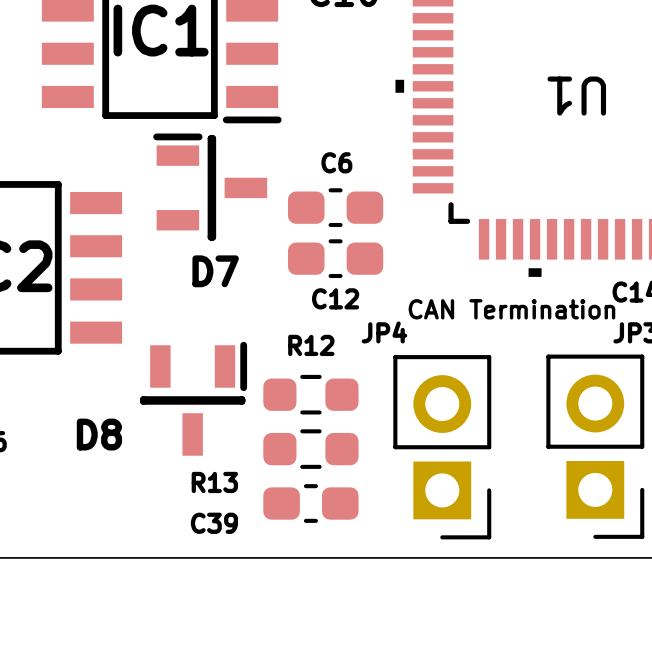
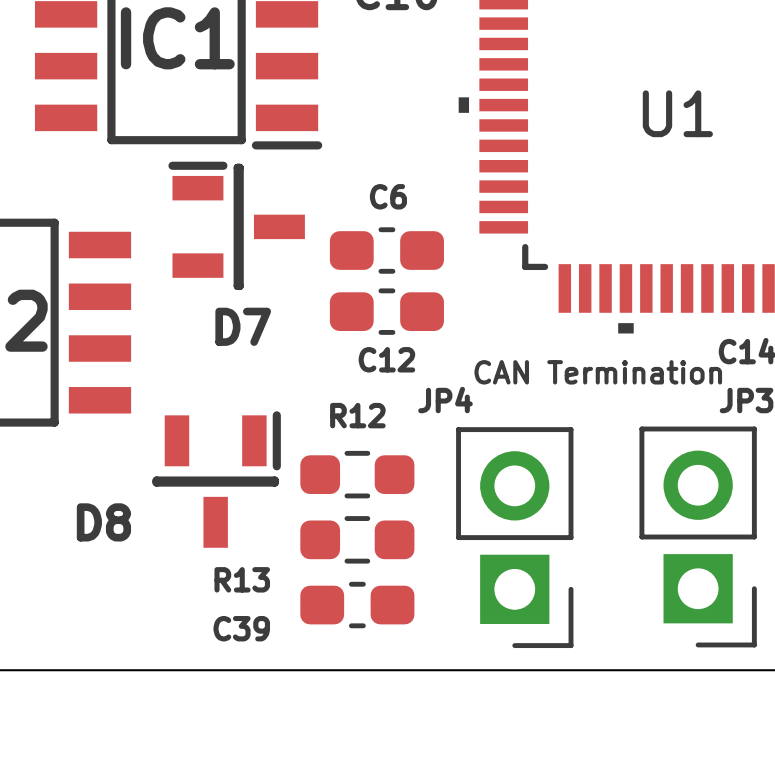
U1 name rotation: 0° (576, 96) -> 180° (677, 113)

